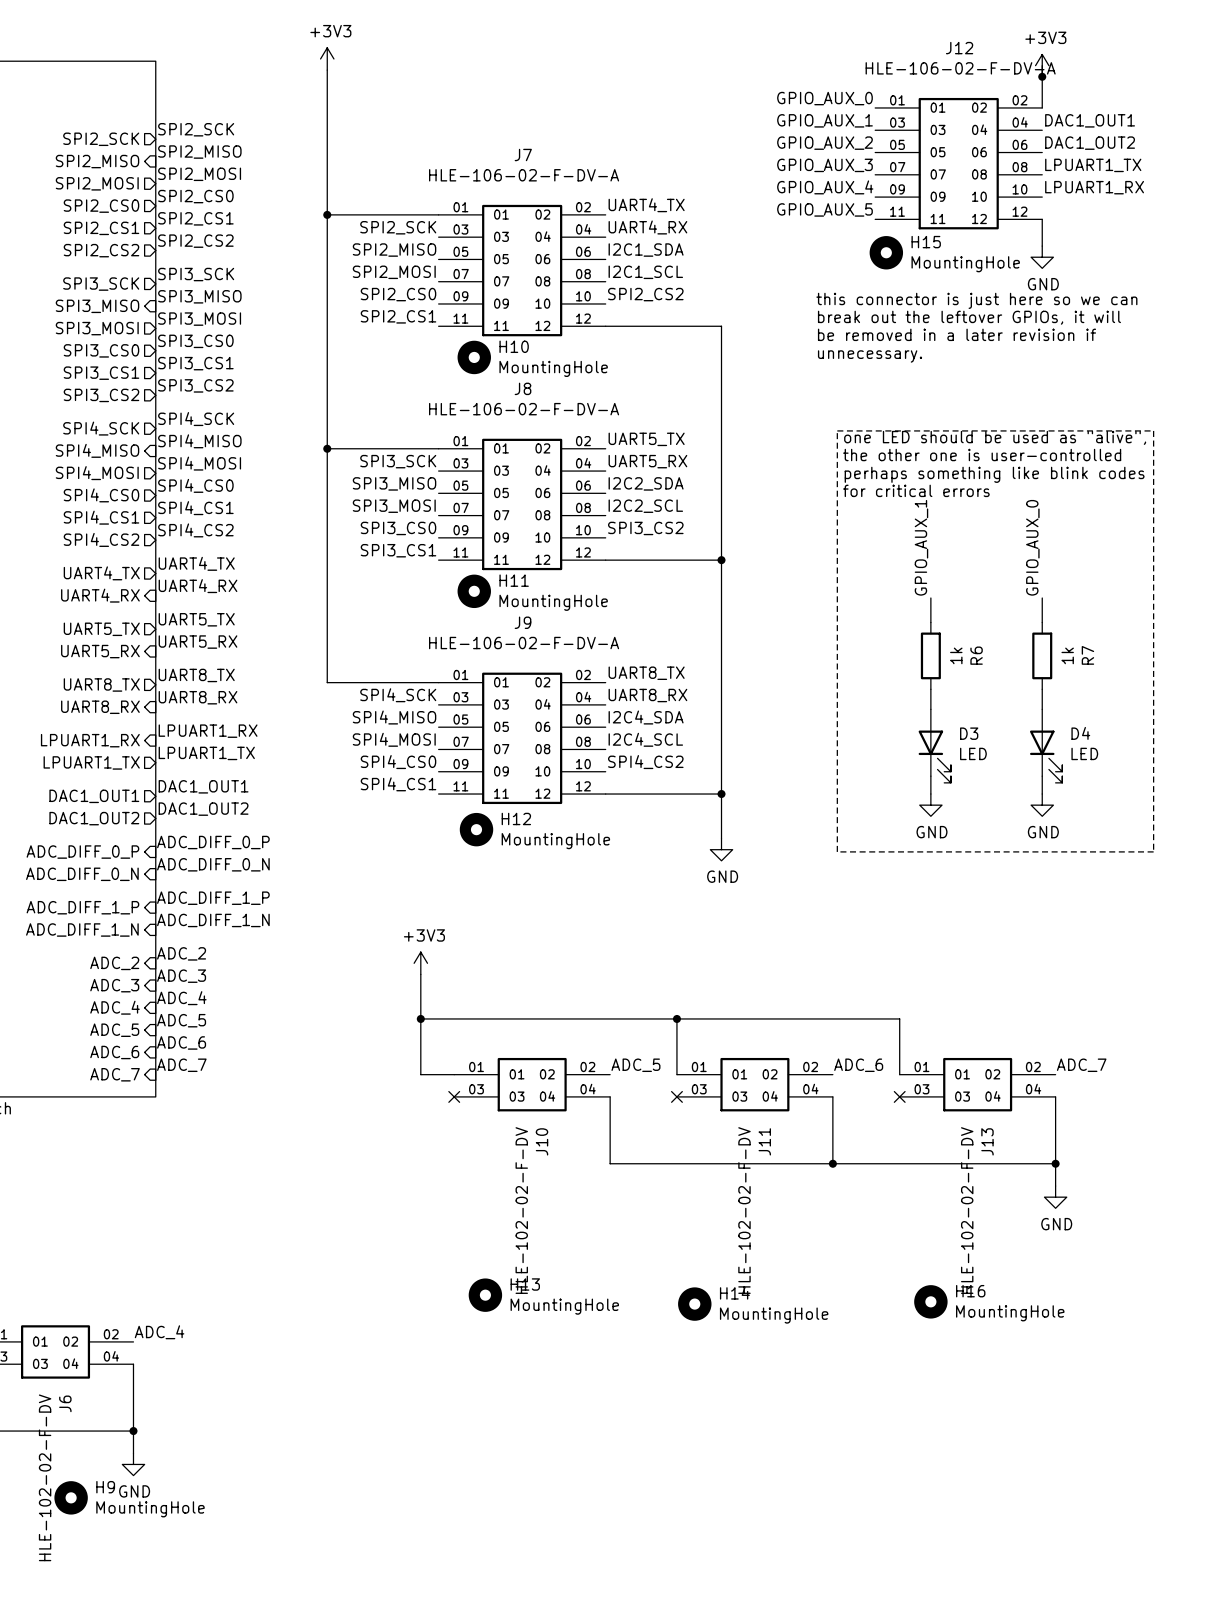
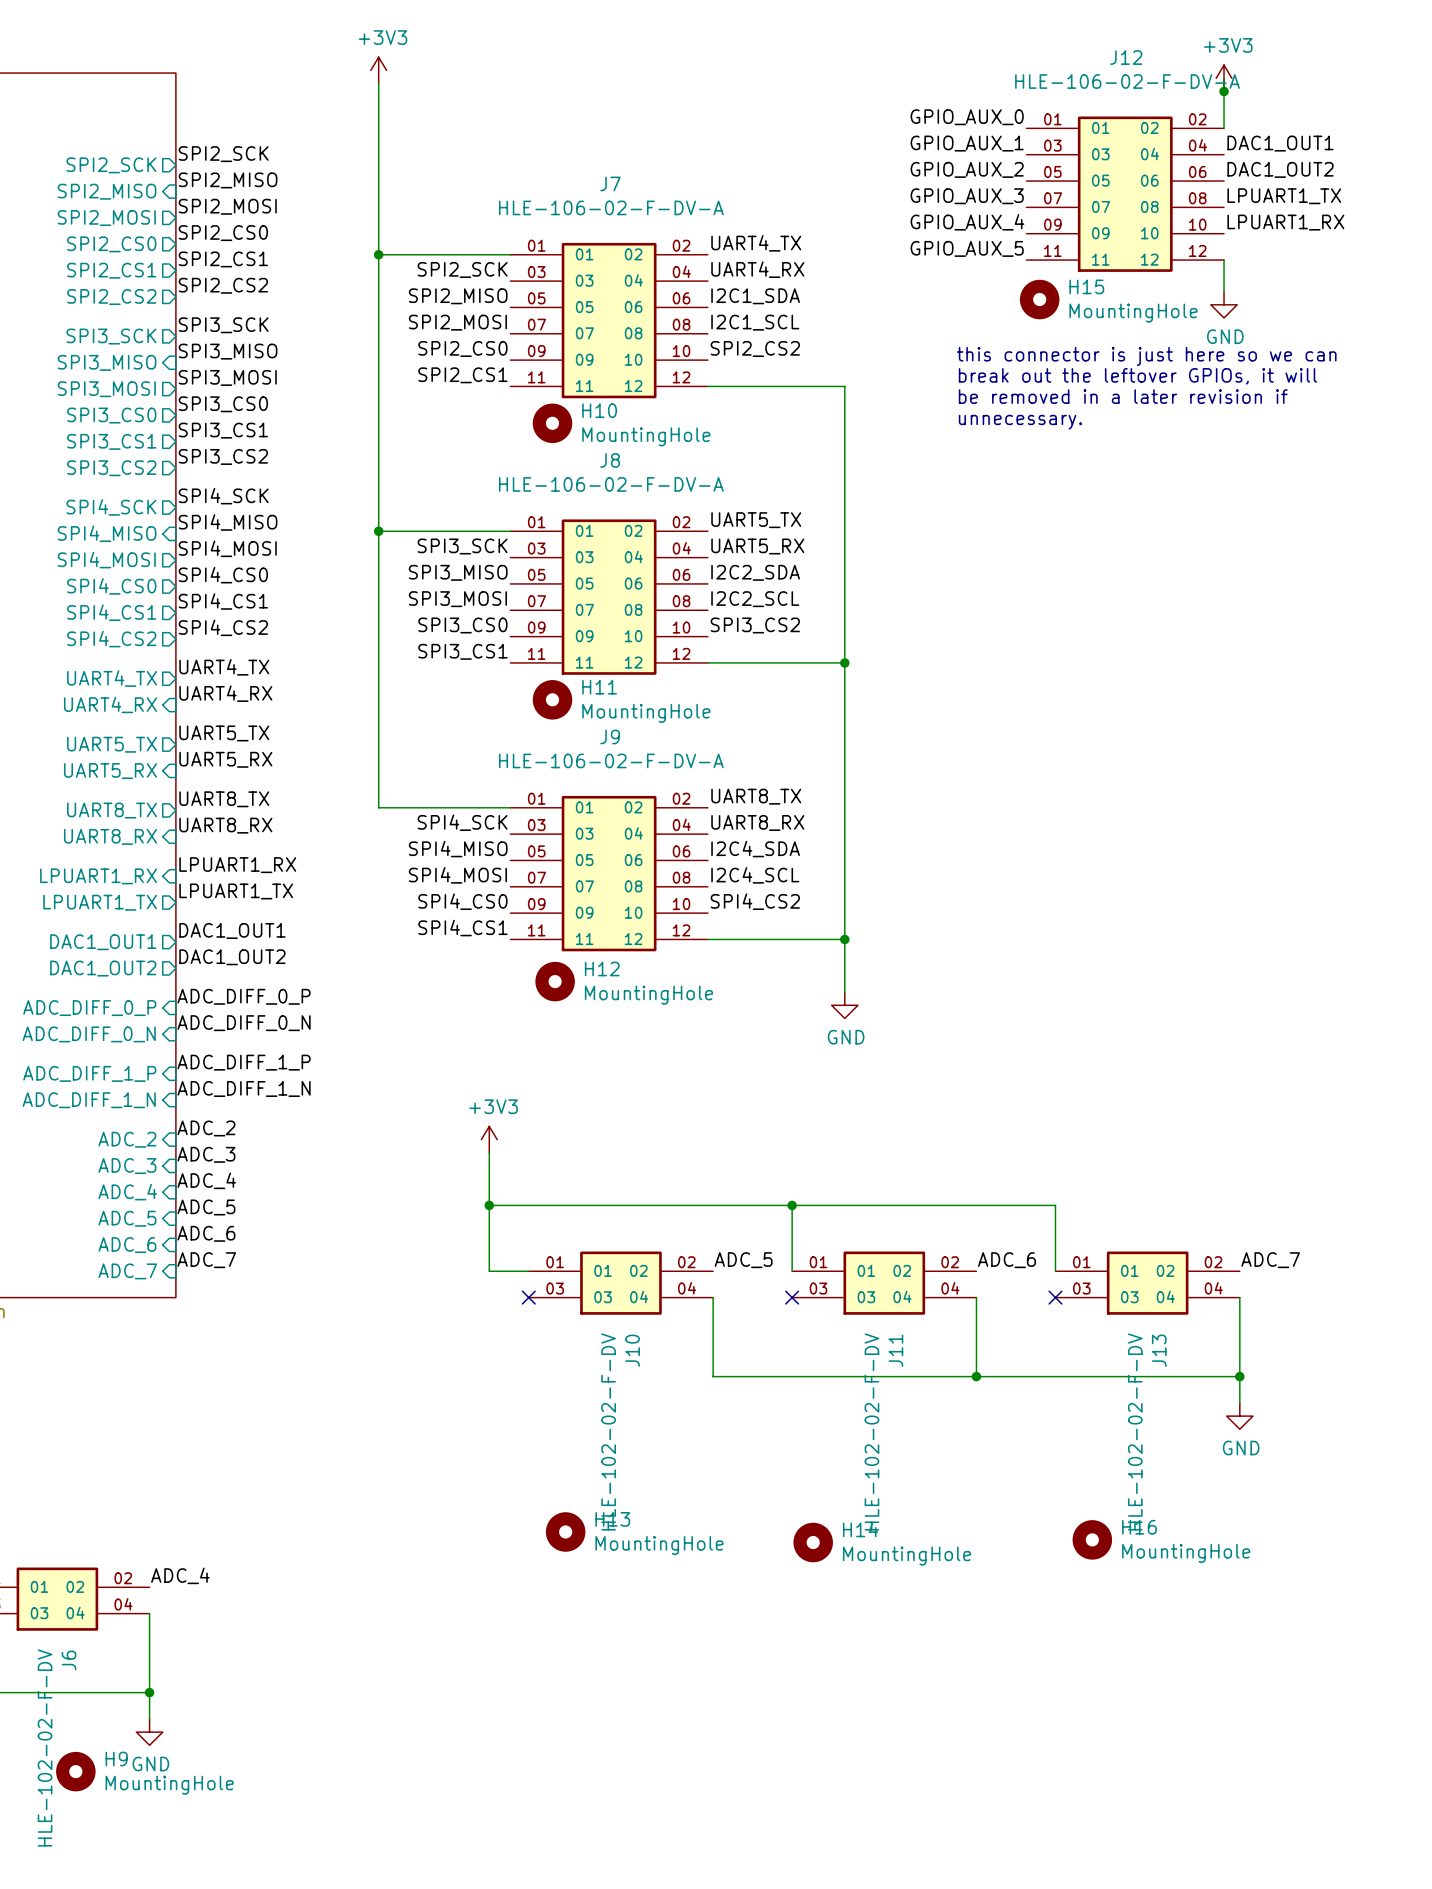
line: (837, 430) (837, 851) (1153, 851) (1153, 430) (837, 430) -> none
text: one LED should be used as "alive", (995, 437) -> none
text: the other one is user-controlled (982, 455) -> none
text: perhaps something like blink codes (994, 474) -> none
text: for critical errors (916, 490) -> none
label: GPIO_AUX_1 (921, 547) -> none
label: GPIO_AUX_0 (1032, 547) -> none
wire: (930, 598) (930, 622) -> none
wire: (1042, 598) (1042, 622) -> none
R6: 1k (930, 655) -> none
R7: 1k (1042, 655) -> none
wire: (930, 689) (930, 709) -> none
wire: (1042, 689) (1042, 709) -> none
D3: LED (934, 746) -> none
D4: LED (1046, 746) -> none
wire: (930, 776) (930, 794) -> none
wire: (1042, 776) (1042, 794) -> none
power symbol: GND (930, 805) -> none
power symbol: GND (1042, 805) -> none

